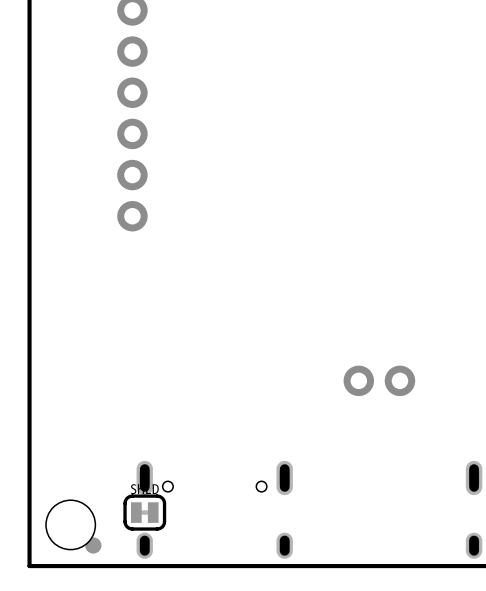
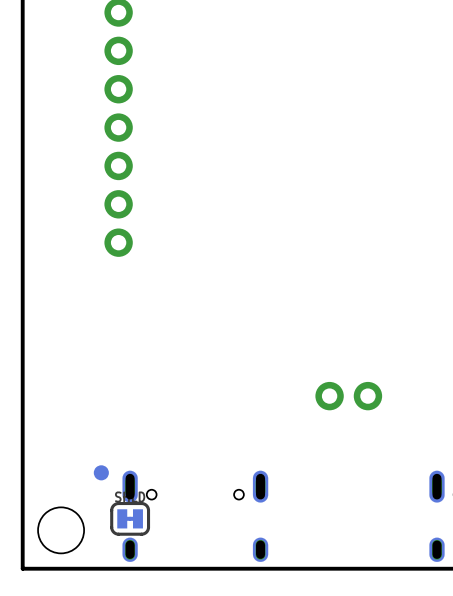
part position: (93, 545) -> (101, 472)

